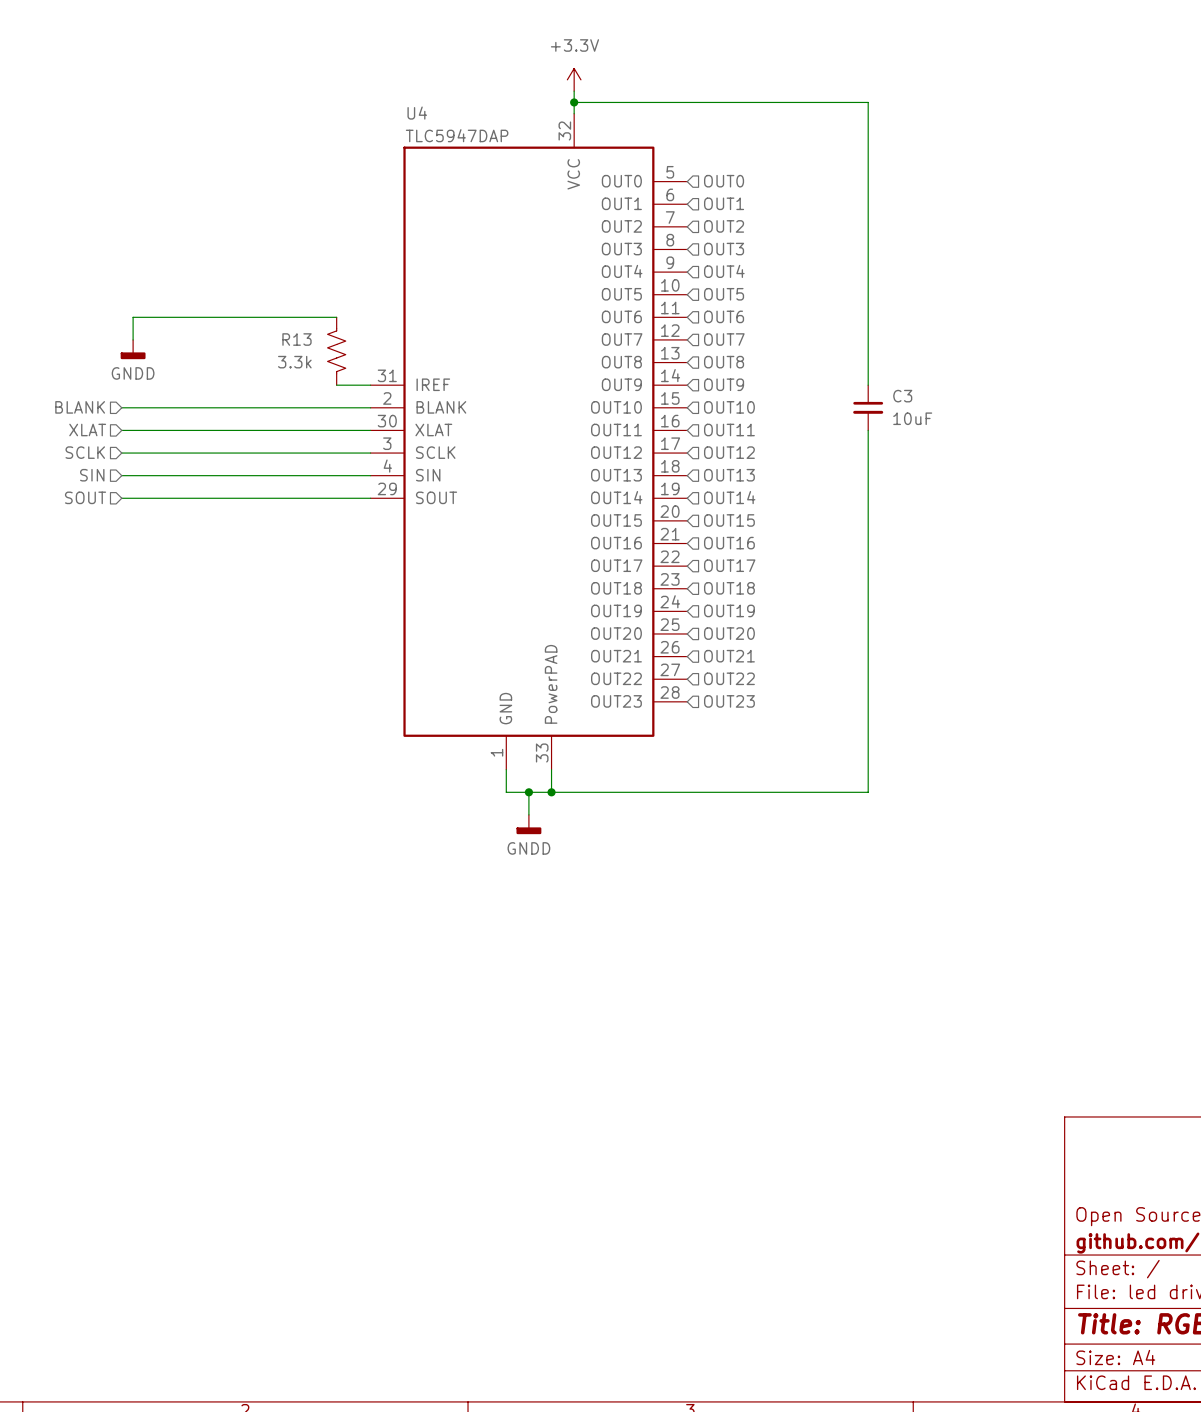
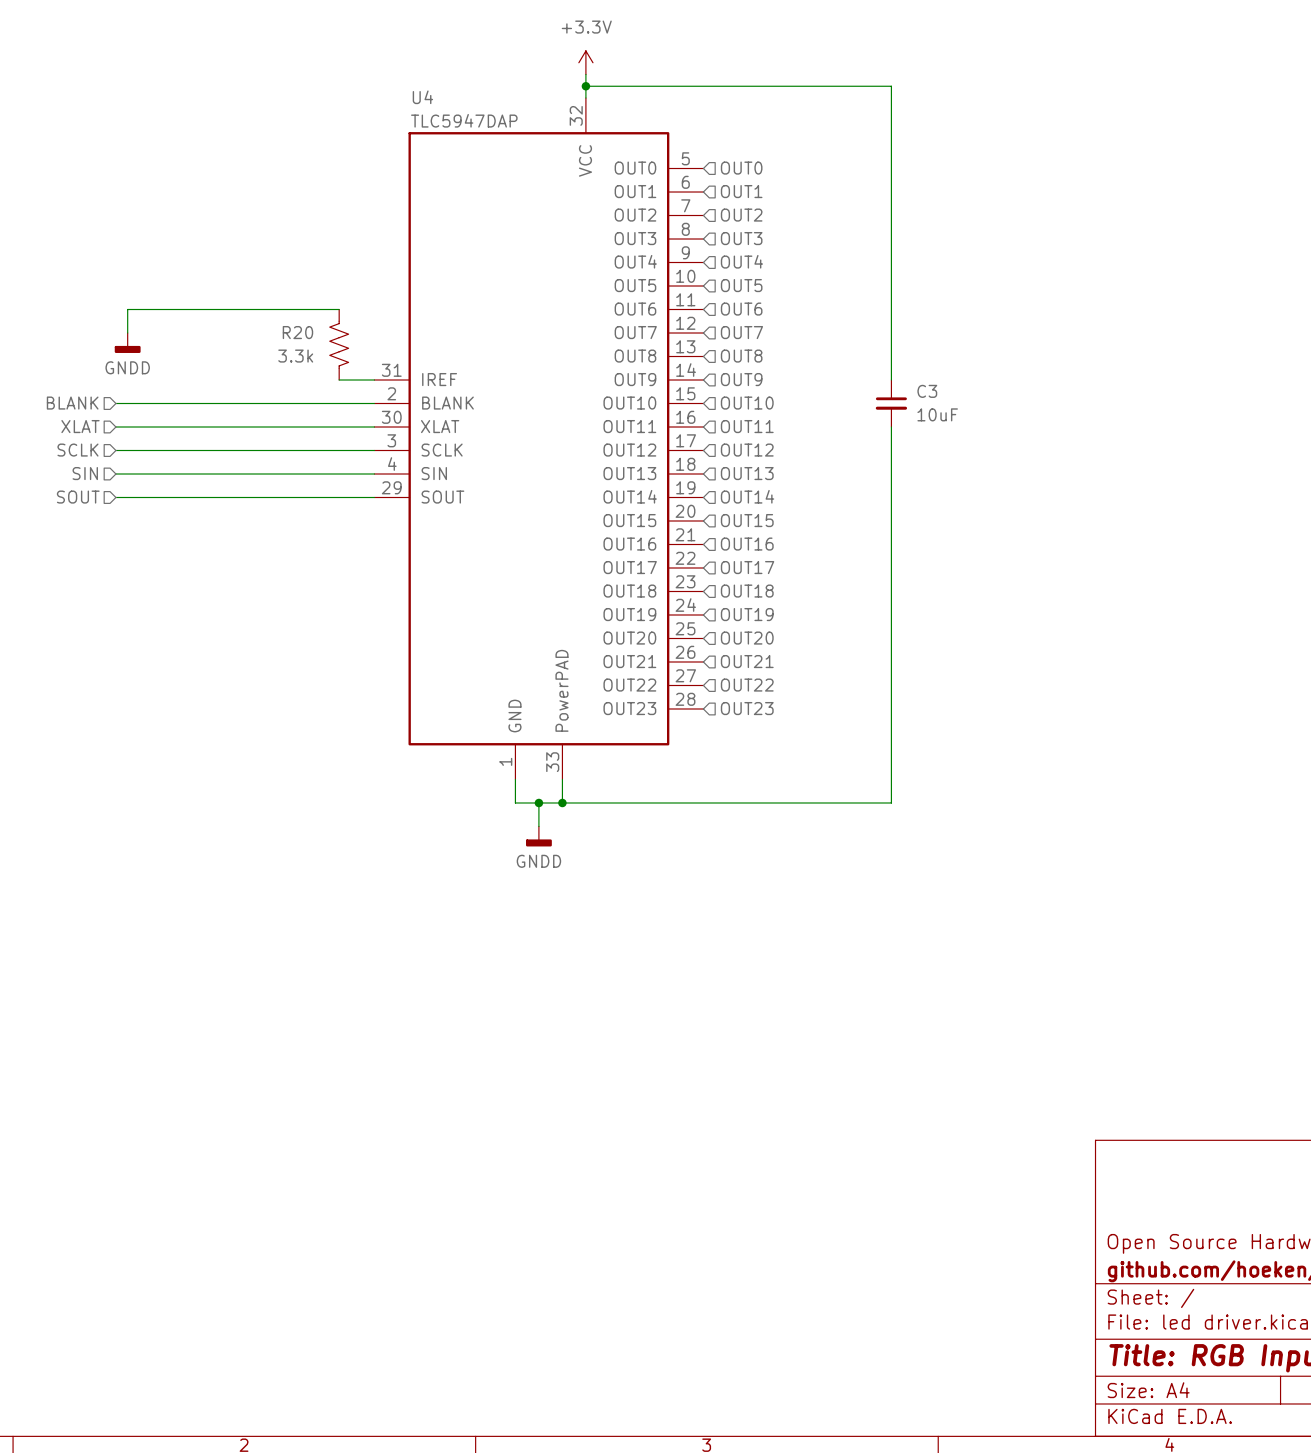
R13 name: R13 (296, 339) -> R20 (297, 332)

